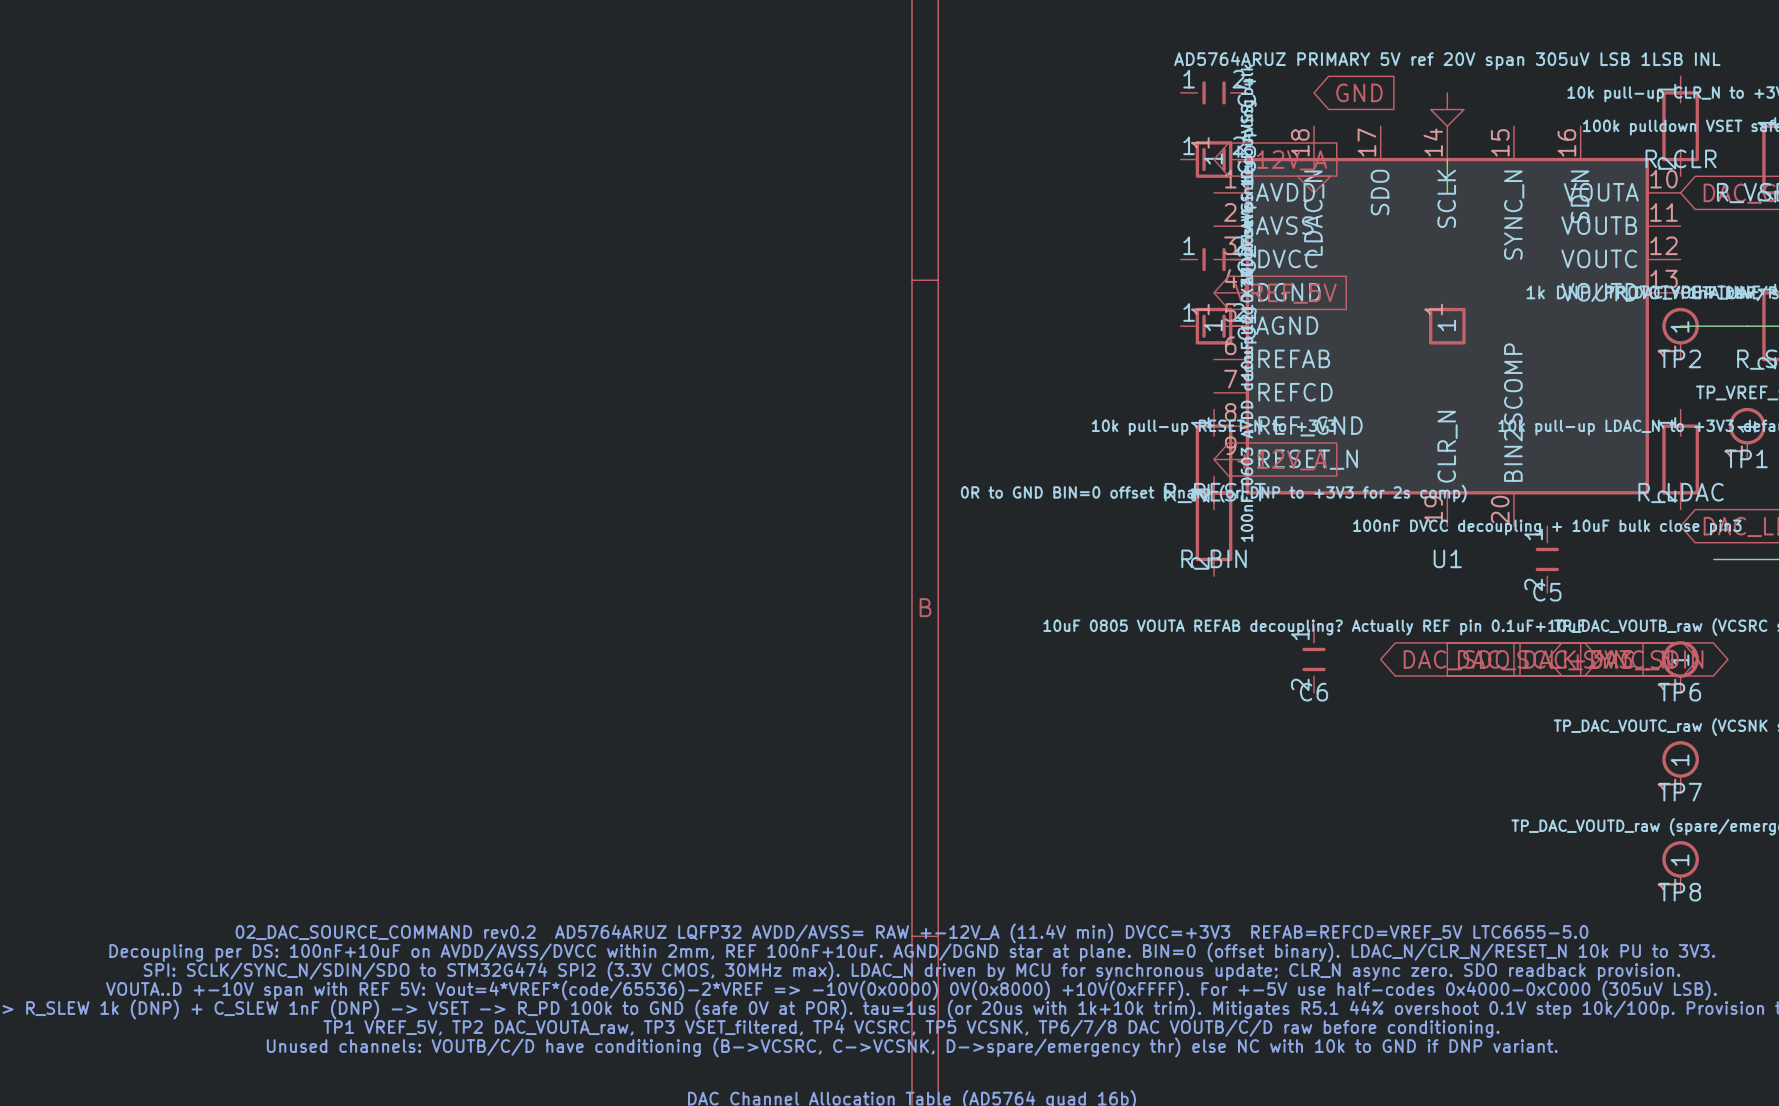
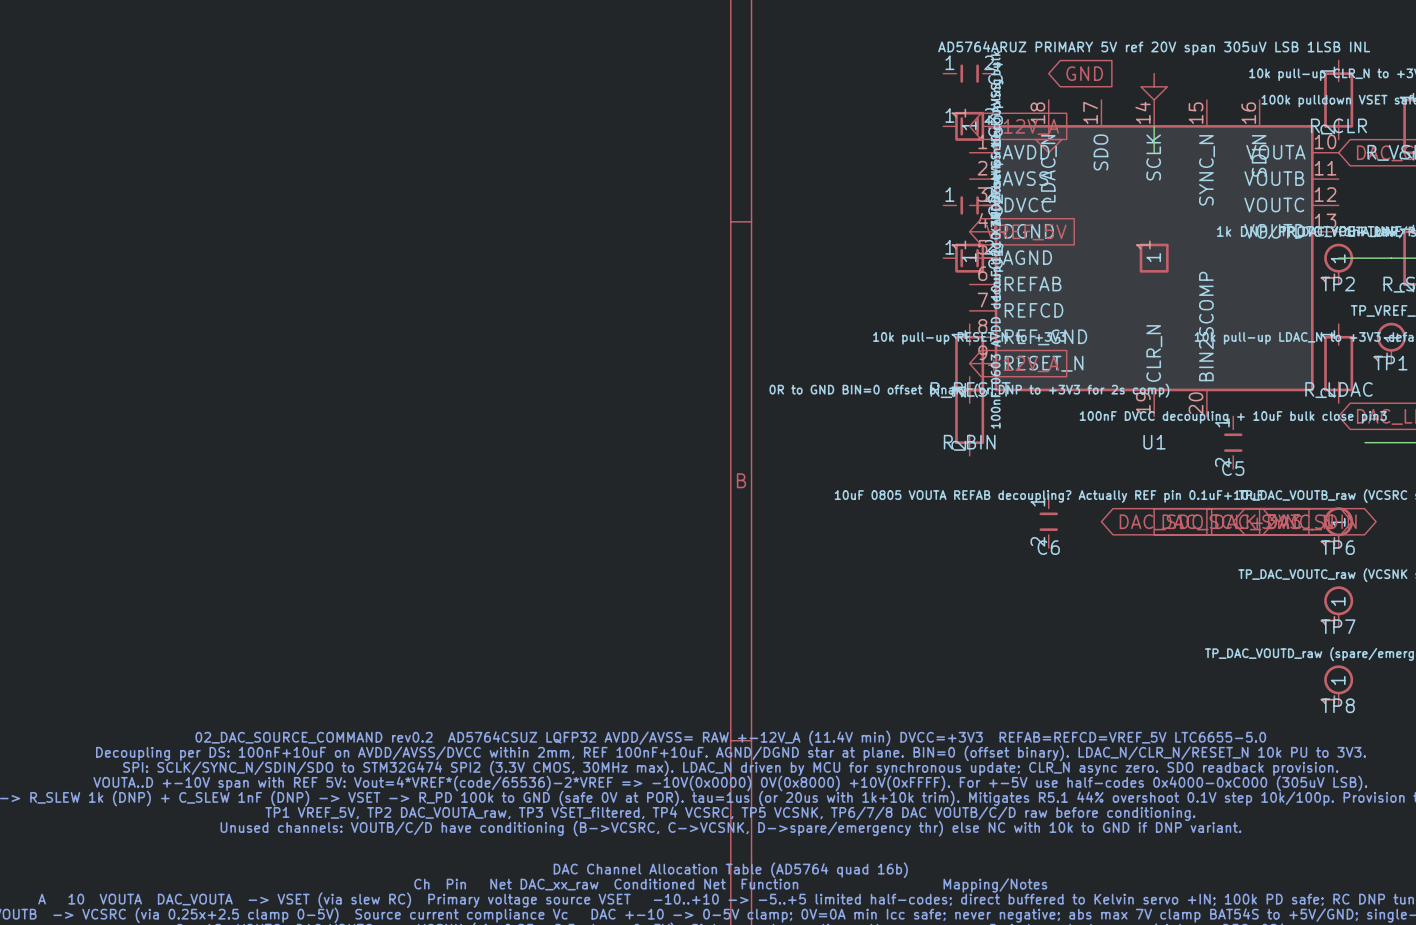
text: 02_DAC_SOURCE_COMMAND rev0.2 AD5764ARUZ LQFP32 AVDD/AVSS= RAW +-12V_A (11.4V min) DVCC=+3V3 REFAB=REFCD=VREF_5V LTC6655-5.0 (912, 933) -> 02_DAC_SOURCE_COMMAND rev0.2 AD5764CSUZ LQFP32 AVDD/AVSS= RAW +-12V_A (11.4V min) DVCC=+3V3 REFAB=REFCD=VREF_5V LTC6655-5.0 (730, 738)

